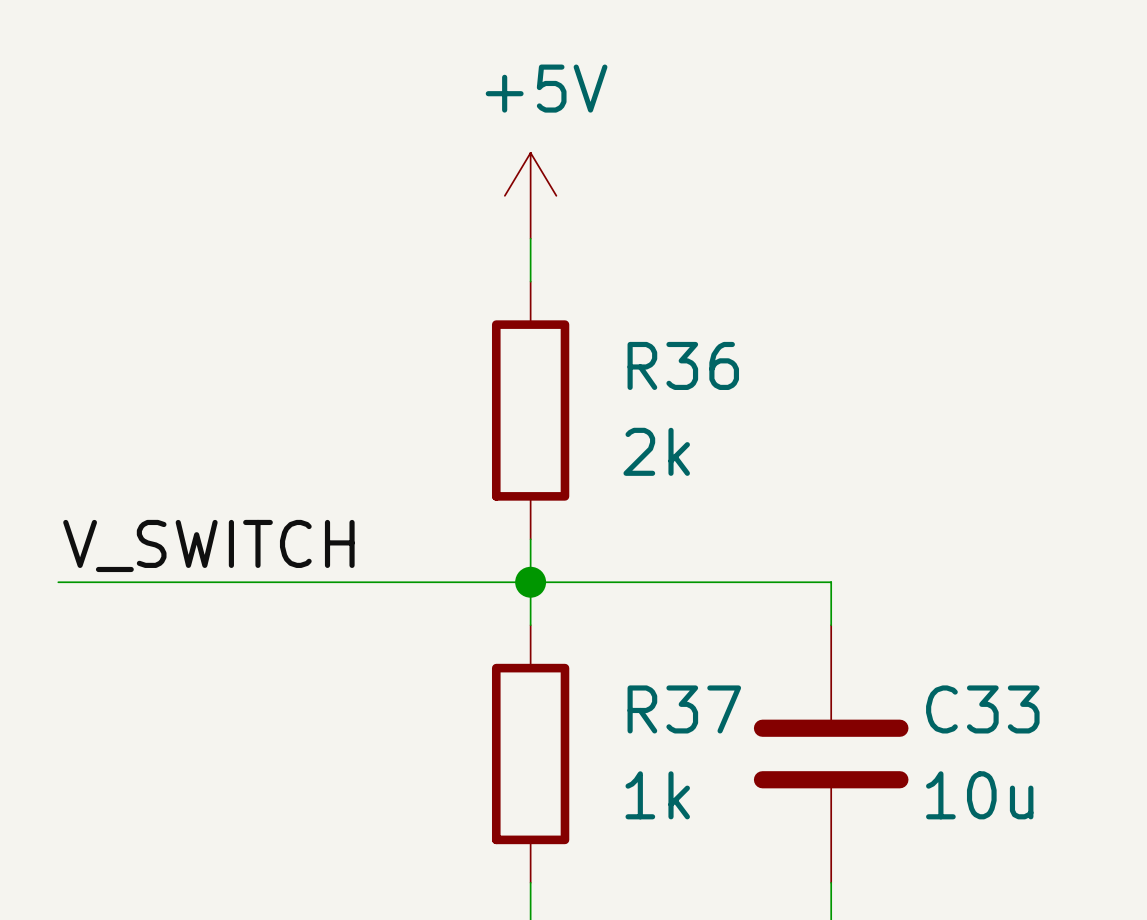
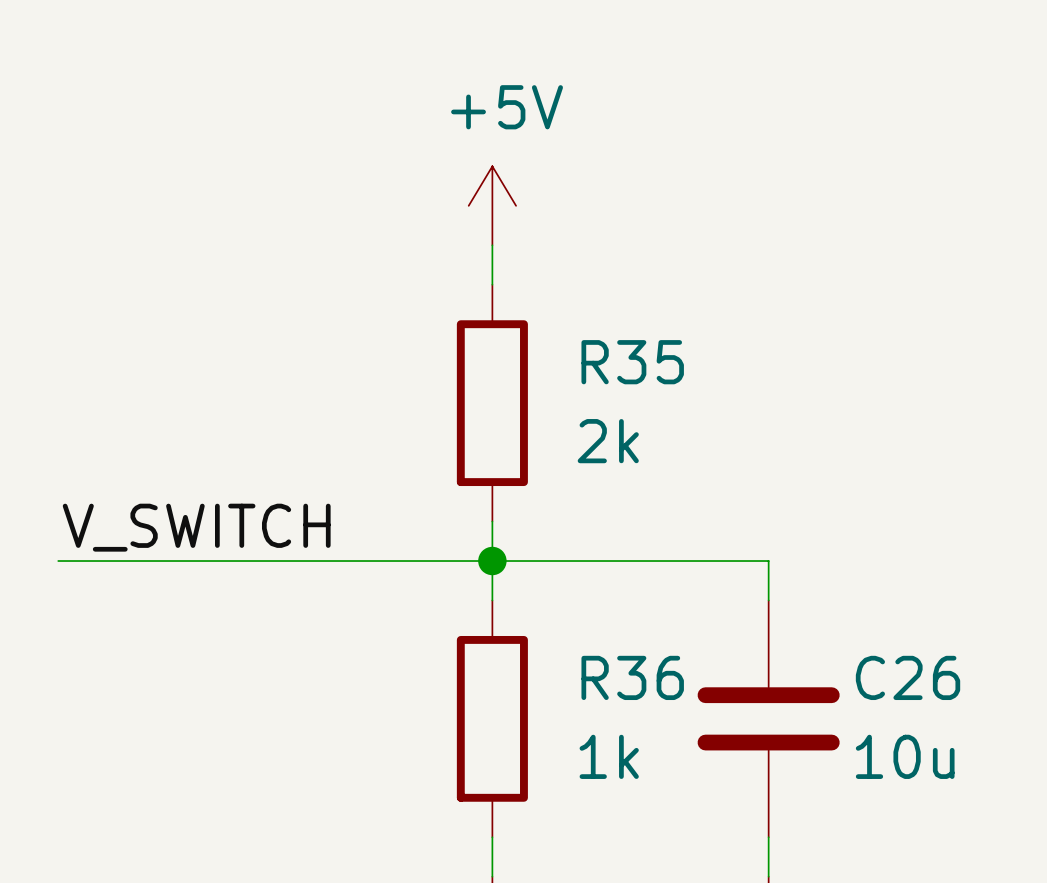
R36 name: R36 (683, 365) -> R35 (632, 362)
R37 name: R37 (684, 709) -> R36 (632, 677)
C33 name: C33 (982, 709) -> C26 (908, 677)

